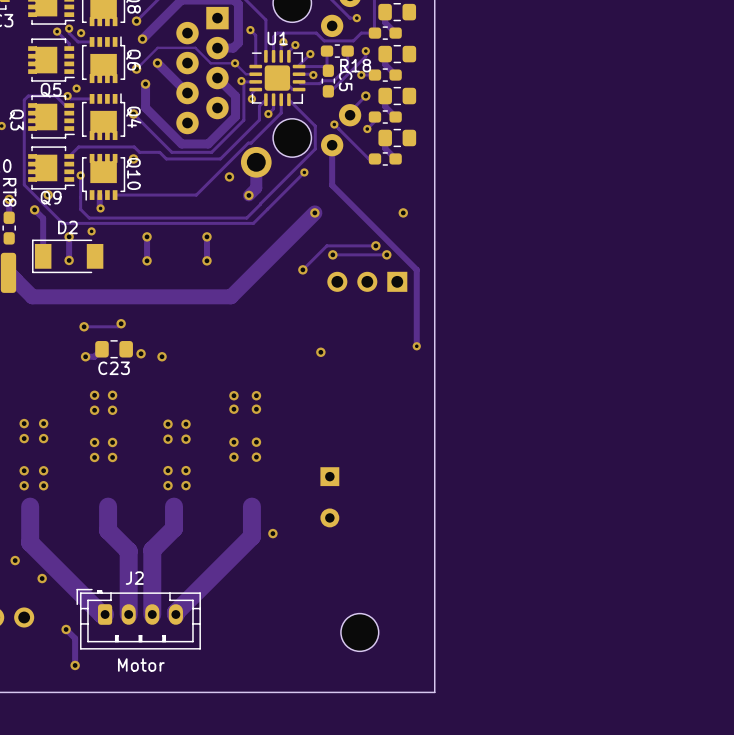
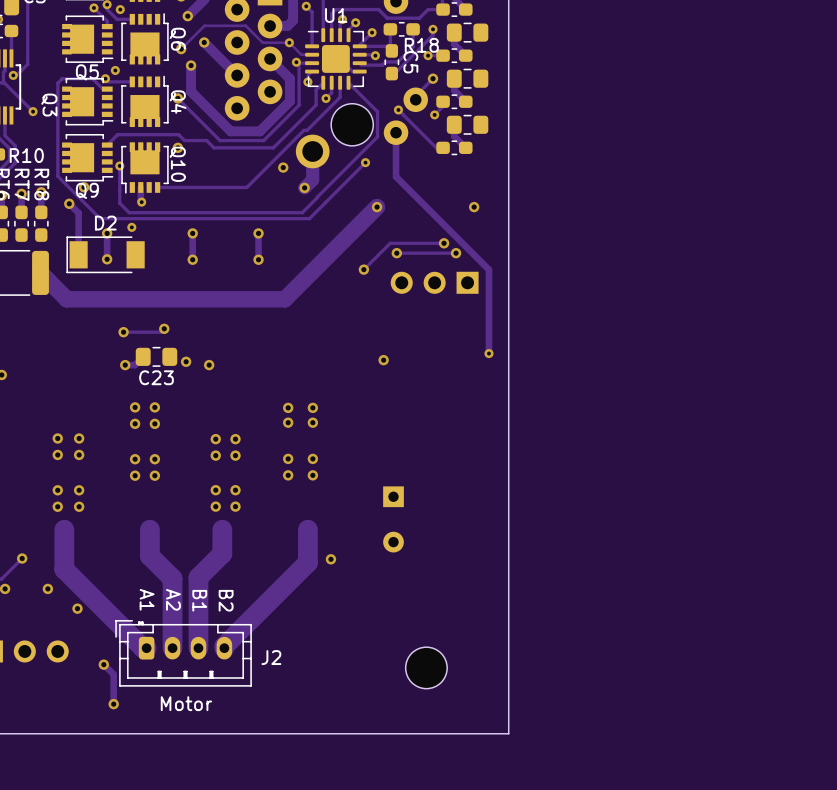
J2 text: none -> A1 (147, 599)
J2 text: none -> A2 (173, 599)
J2 text: none -> B1 (199, 600)
J2 text: none -> B2 (226, 600)
J2 name position: J2 (134, 578) -> J2 (271, 657)

